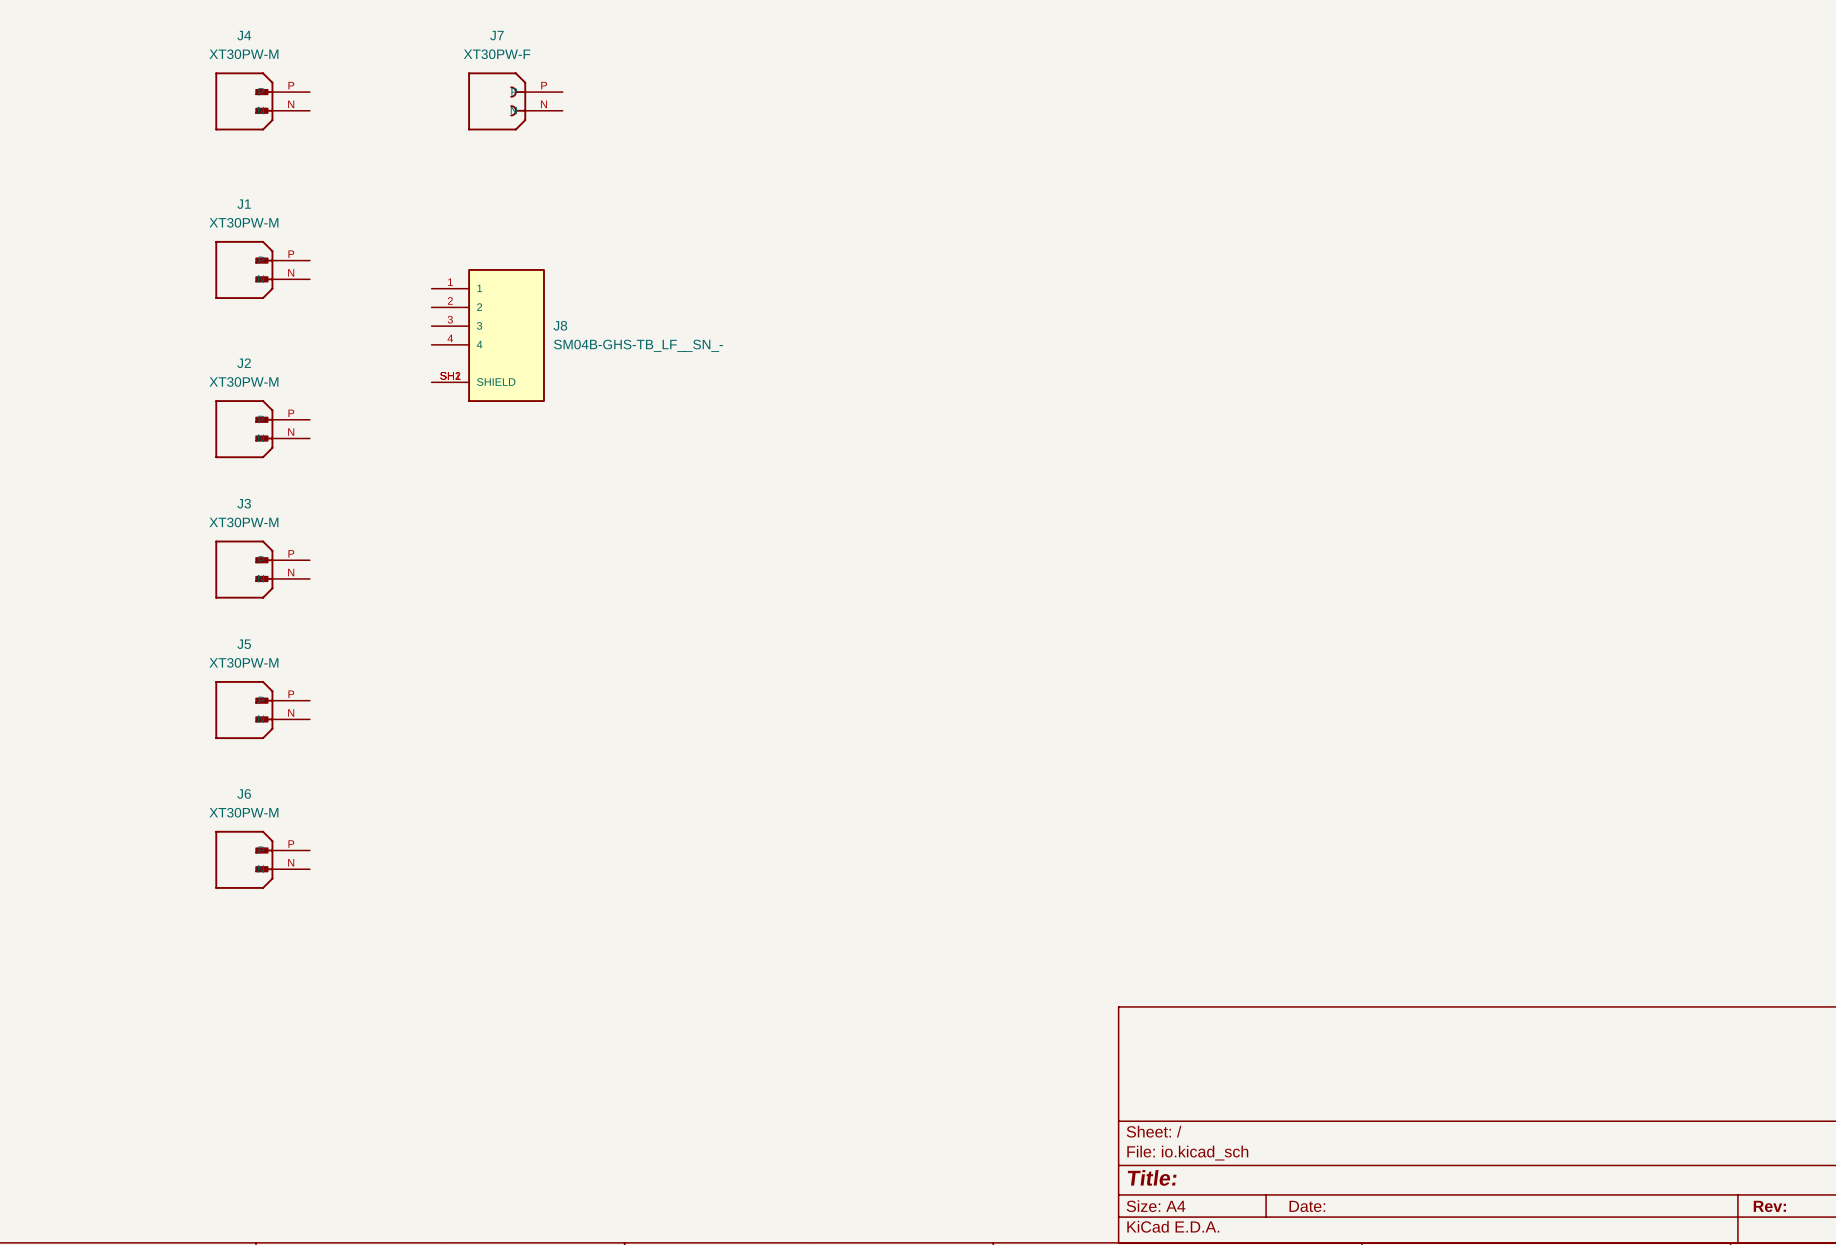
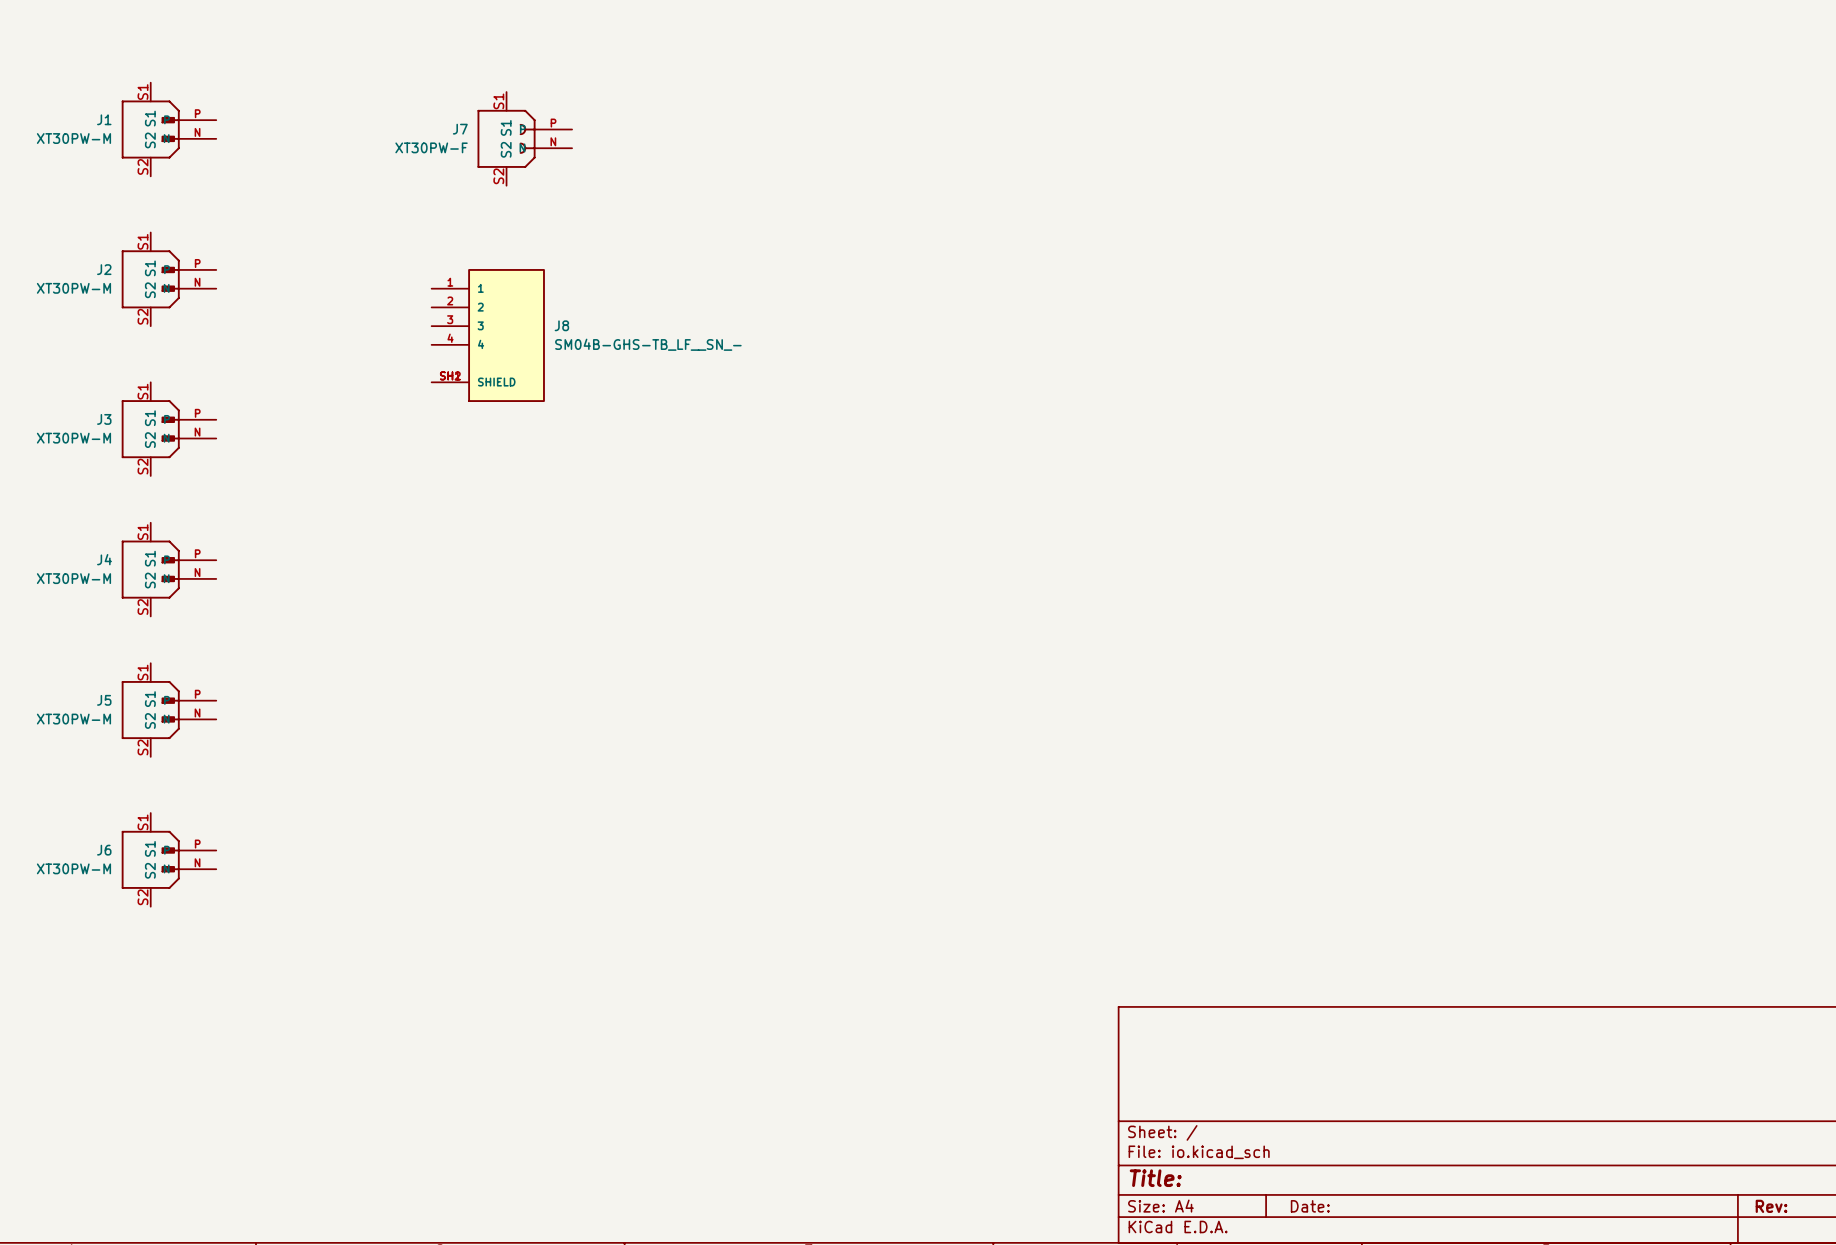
J4 name position: J4 (244, 35) -> J4 (104, 559)
J7 name position: J7 (496, 35) -> J7 (460, 129)
J4 value position: XT30PW-M (243, 54) -> XT30PW-M (73, 578)
J7 value position: XT30PW-F (497, 54) -> XT30PW-F (431, 147)
J4 symbol: [215, 72, 310, 131] -> [121, 522, 217, 617]
J7 symbol: [468, 72, 563, 131] -> [477, 92, 573, 186]
J1 name position: J1 (244, 204) -> J1 (104, 119)
J1 value position: XT30PW-M (243, 222) -> XT30PW-M (73, 138)
J1 symbol: [215, 240, 310, 299] -> [121, 82, 217, 177]
J2 name position: J2 (244, 363) -> J2 (104, 269)
J2 value position: XT30PW-M (243, 381) -> XT30PW-M (73, 288)
J2 symbol: [215, 400, 310, 459] -> [121, 232, 217, 327]
J3 name position: J3 (244, 503) -> J3 (104, 419)
J3 value position: XT30PW-M (243, 522) -> XT30PW-M (73, 438)
J3 symbol: [215, 540, 310, 599] -> [121, 382, 217, 476]
J5 name position: J5 (244, 644) -> J5 (104, 700)
J5 value position: XT30PW-M (243, 662) -> XT30PW-M (73, 719)
J5 symbol: [215, 681, 310, 740] -> [121, 663, 217, 757]
J6 name position: J6 (244, 793) -> J6 (104, 850)
J6 value position: XT30PW-M (243, 812) -> XT30PW-M (73, 868)
J6 symbol: [215, 830, 310, 889] -> [121, 813, 217, 907]

